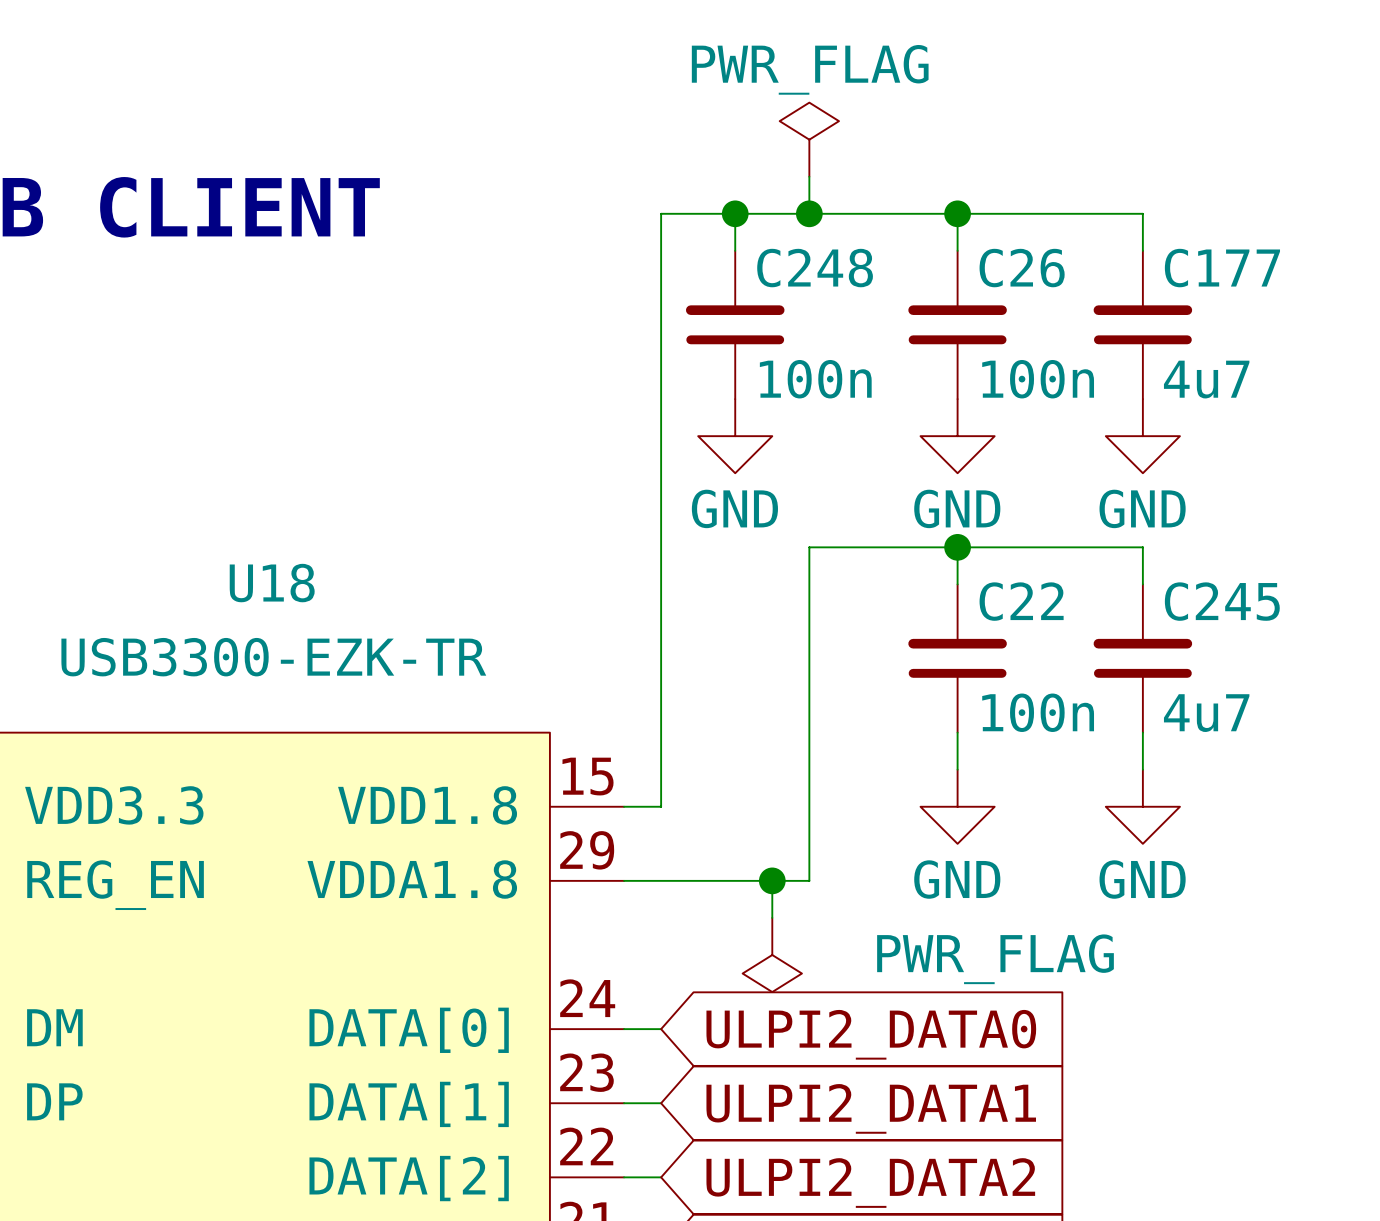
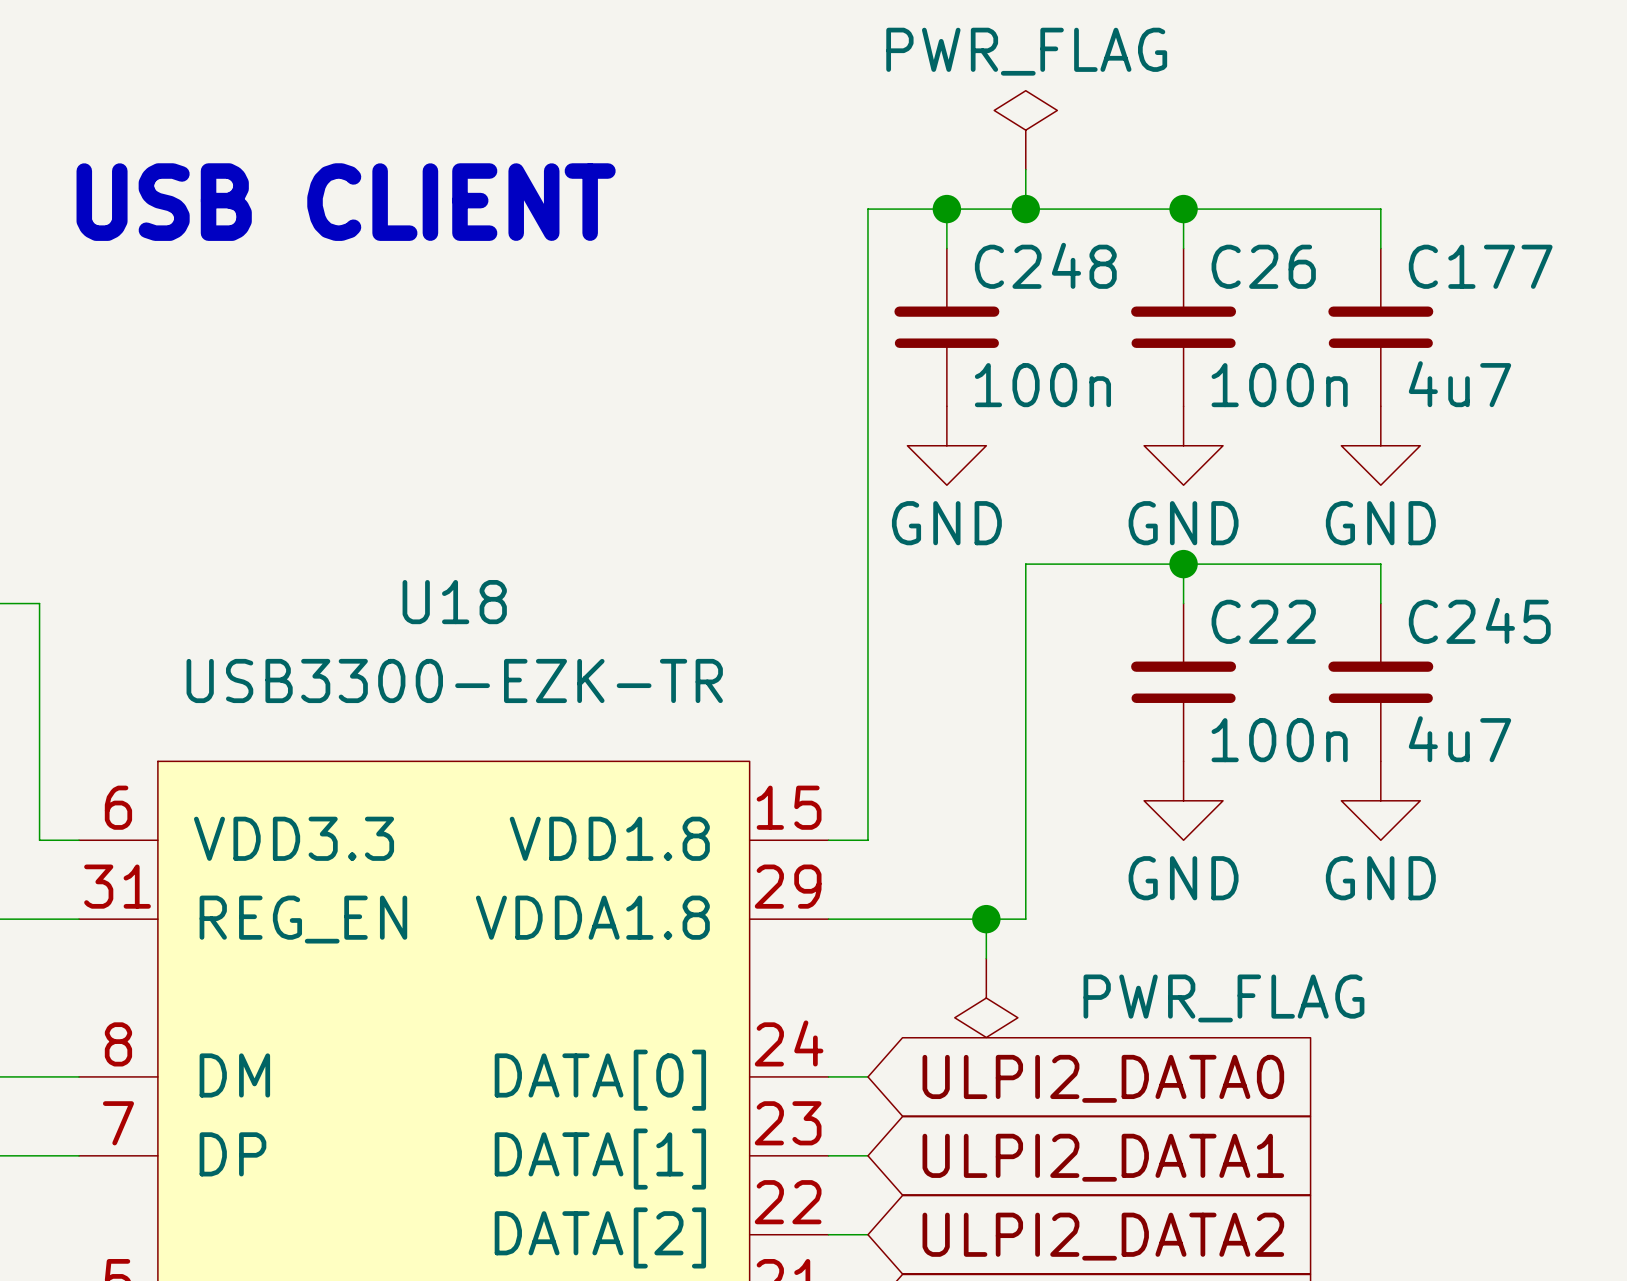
power symbol position: GND (957, 806) -> GND (1183, 800)
power symbol position: GND (1142, 806) -> GND (1380, 800)

